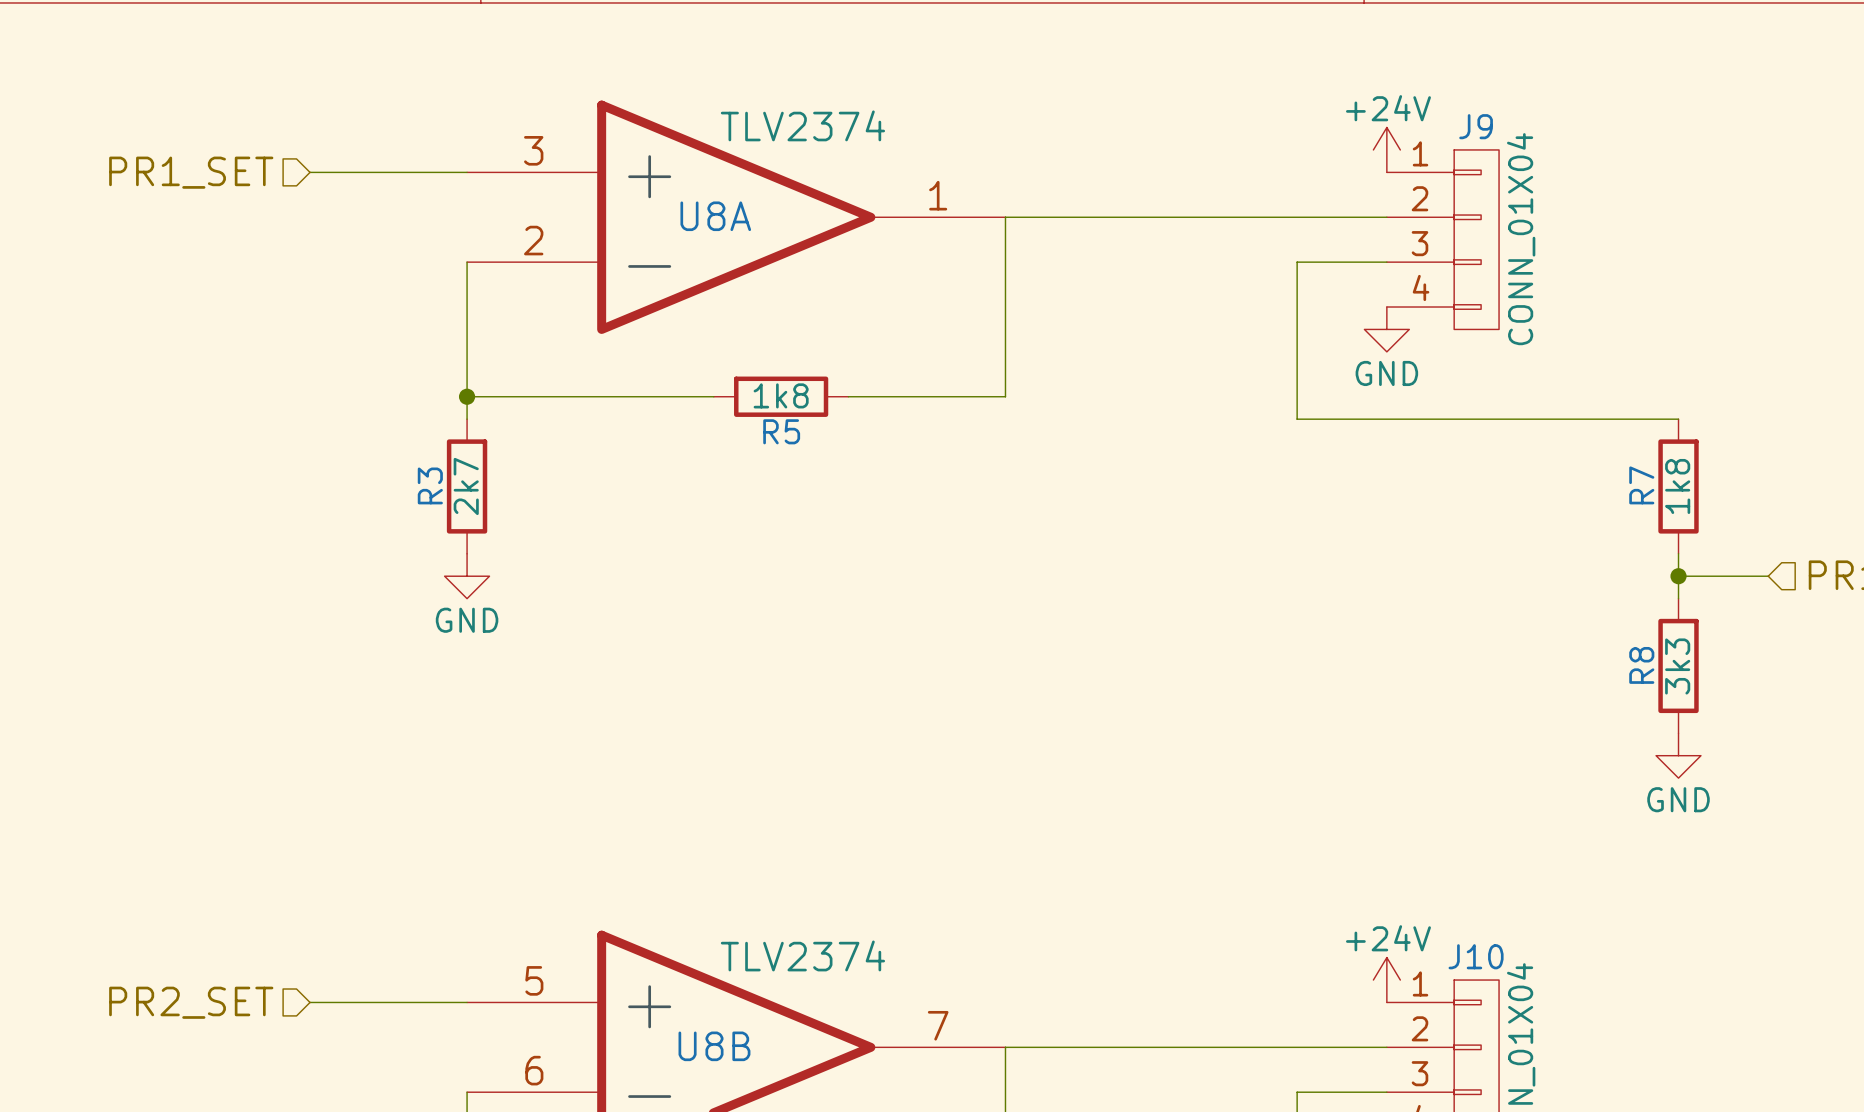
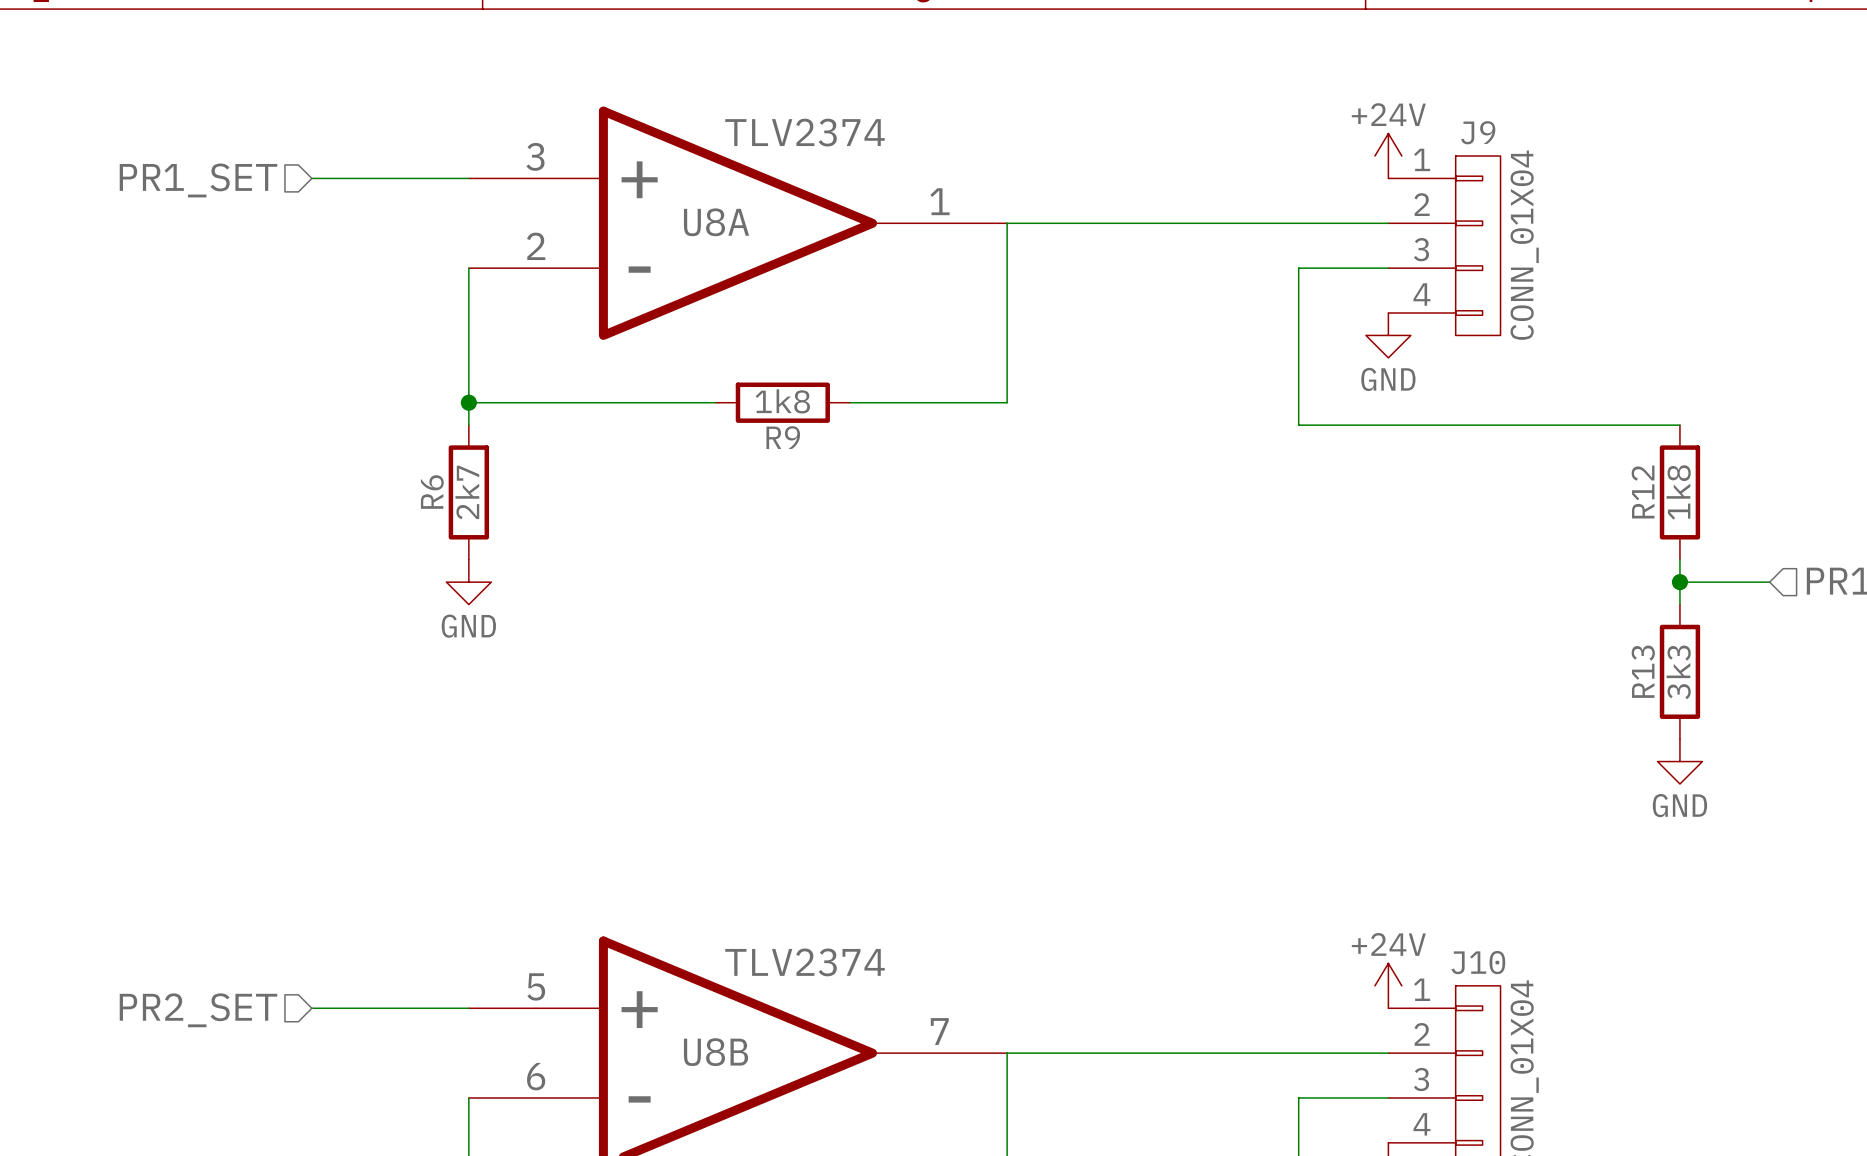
R5 name: R5 (781, 431) -> R9 (783, 437)
R3 name: R3 (430, 485) -> R6 (432, 492)
R7 name: R7 (1641, 485) -> R12 (1643, 491)
R8 name: R8 (1641, 665) -> R13 (1643, 671)

